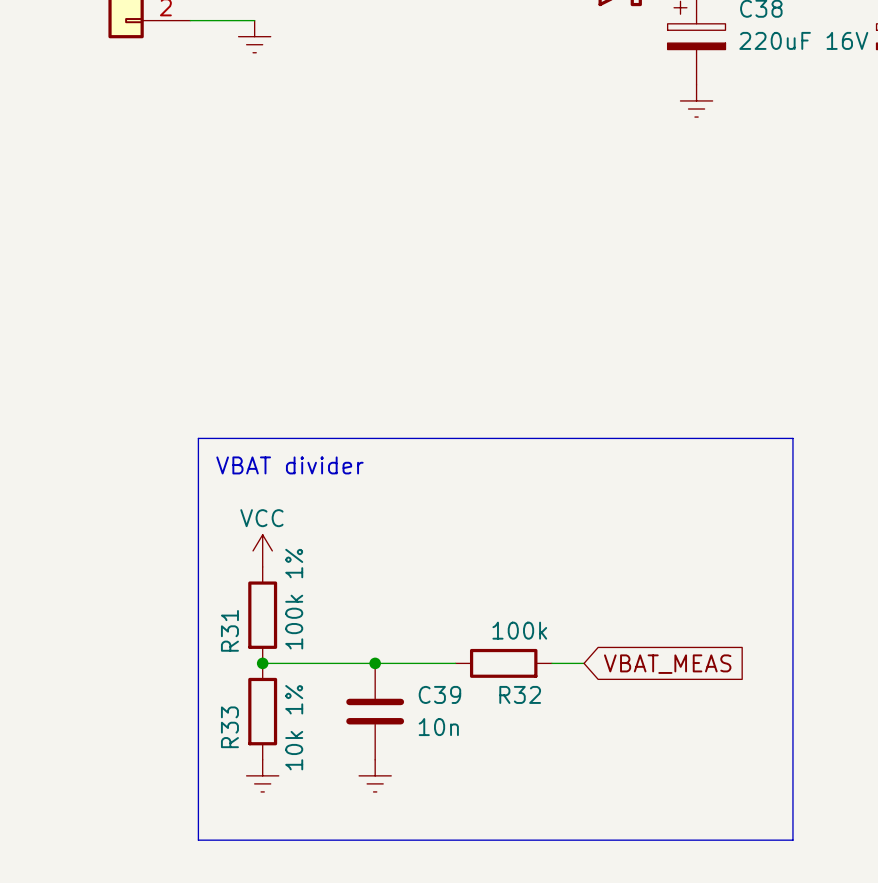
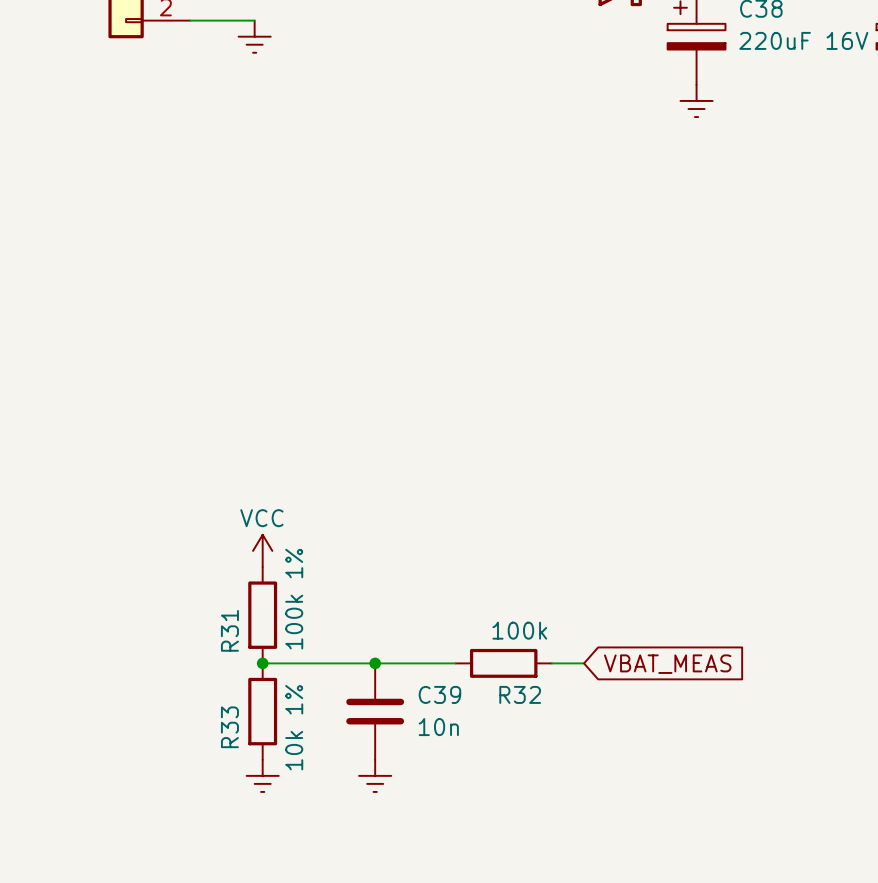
line: (198, 438) (198, 840) (792, 840) (792, 438) (198, 438) -> none
text: VBAT divider (289, 465) -> none

